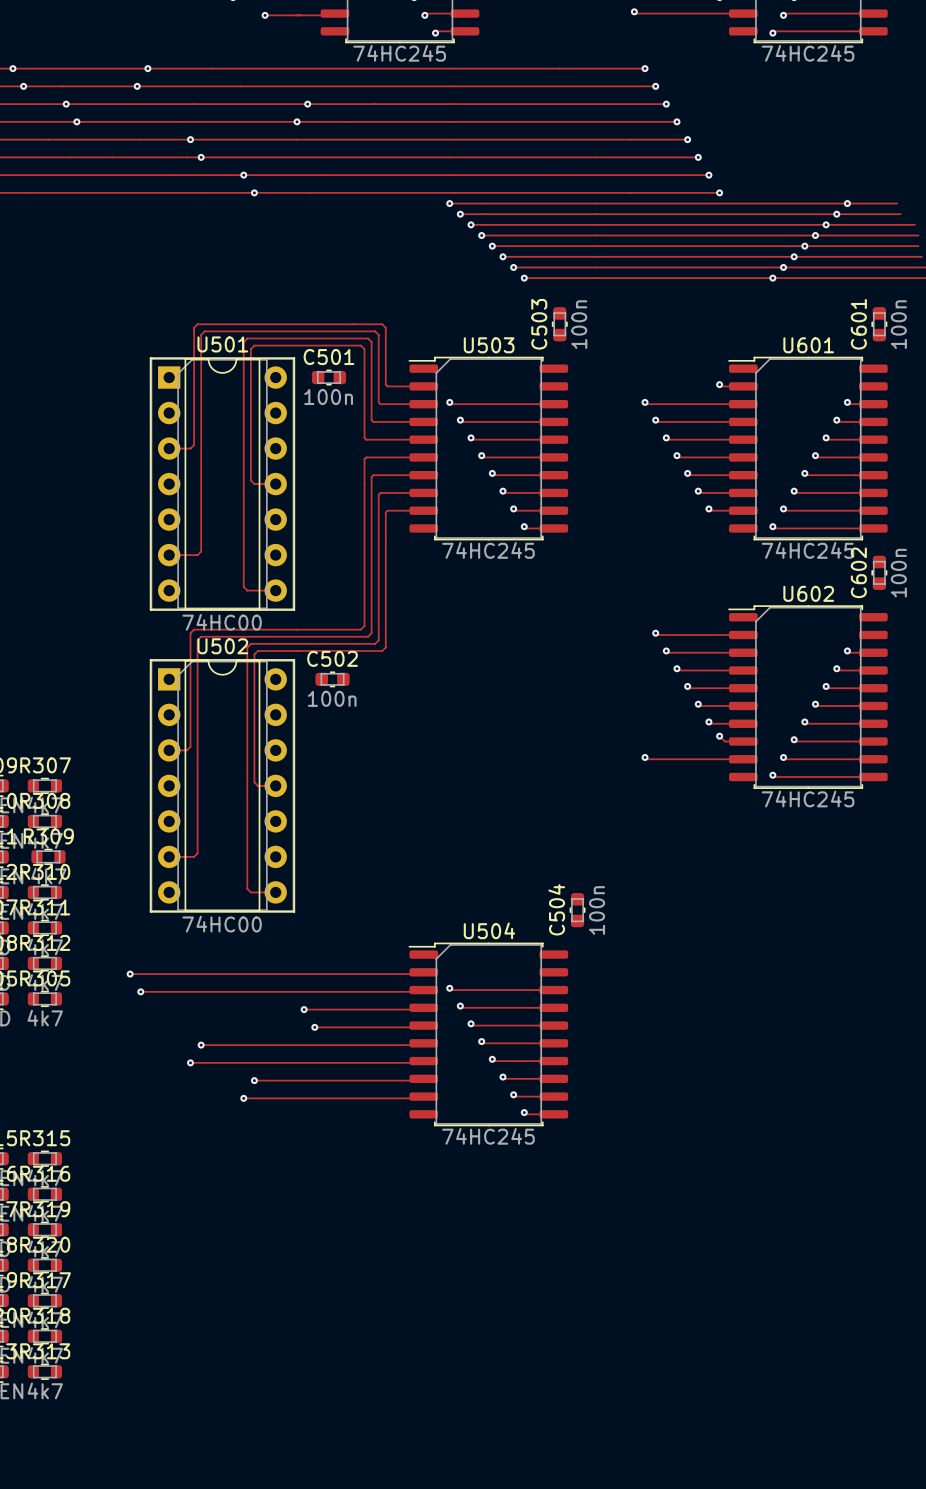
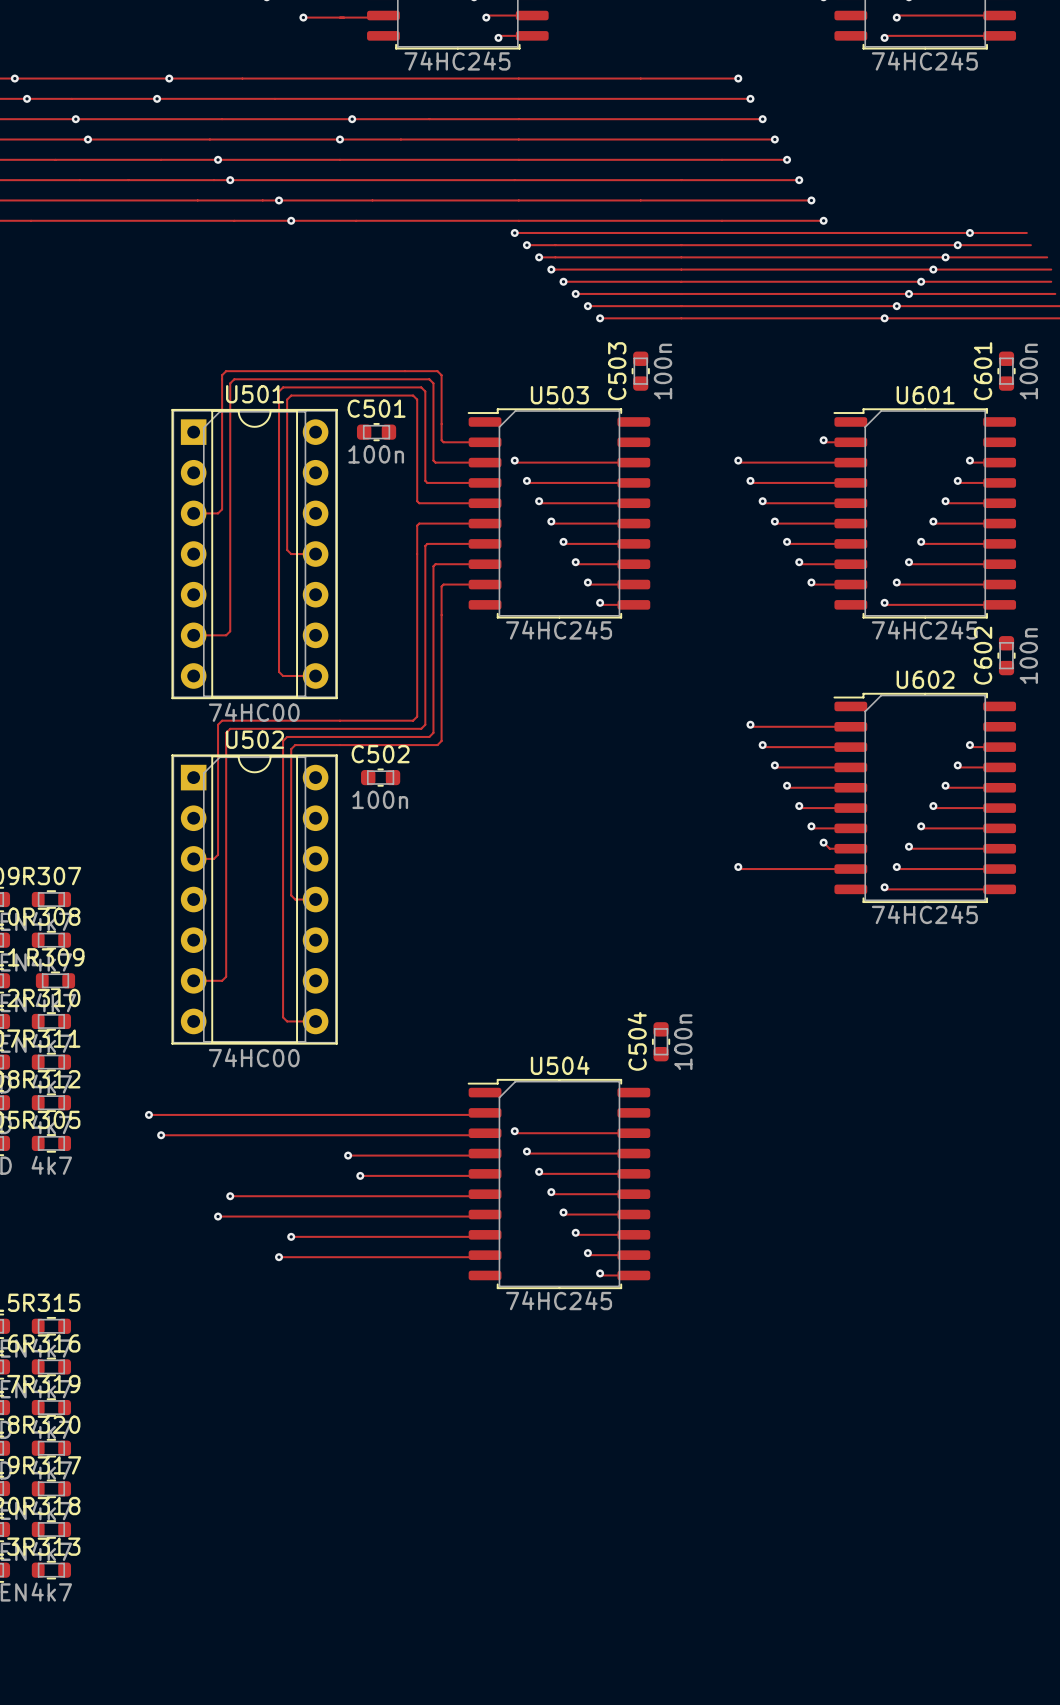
track: (634, 11) (636, 13) (743, 13) -> none
via: (634, 11) -> none

